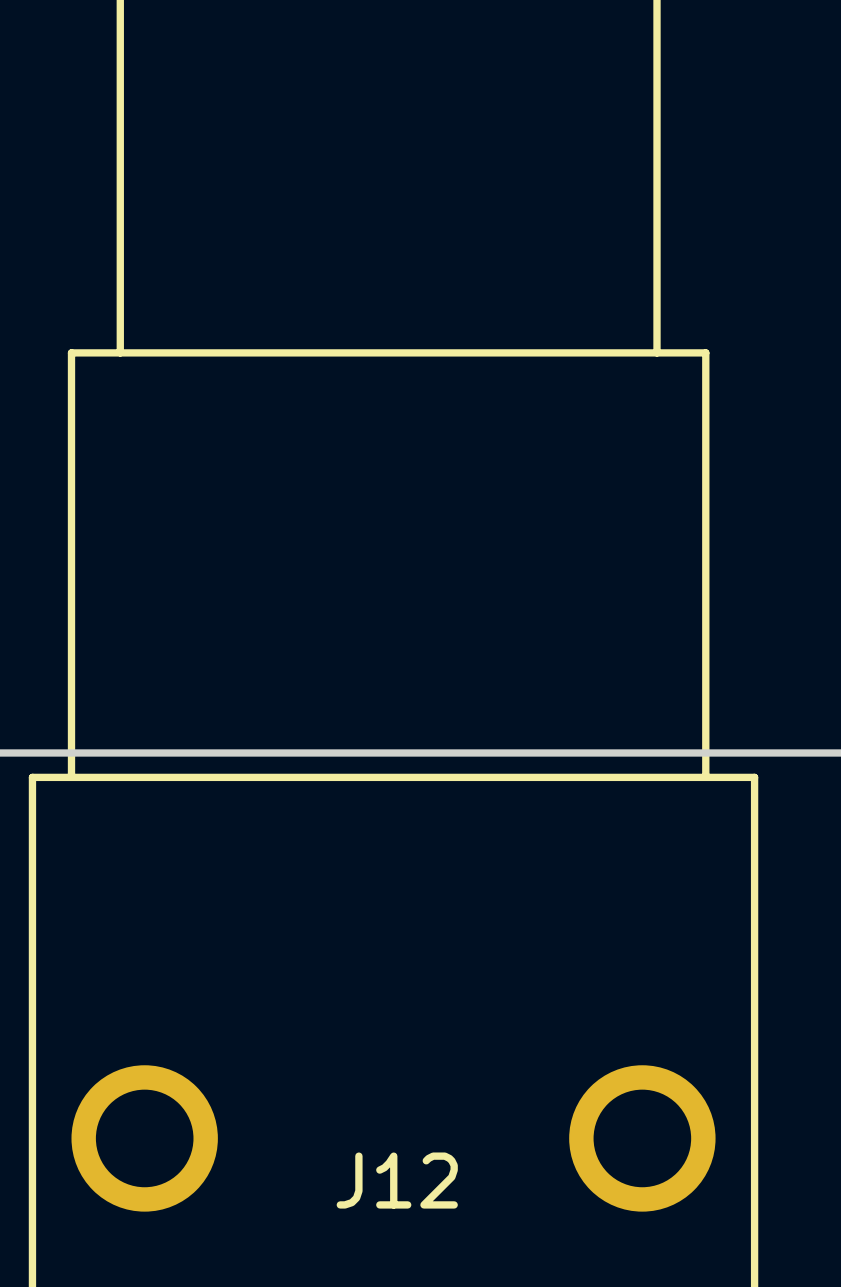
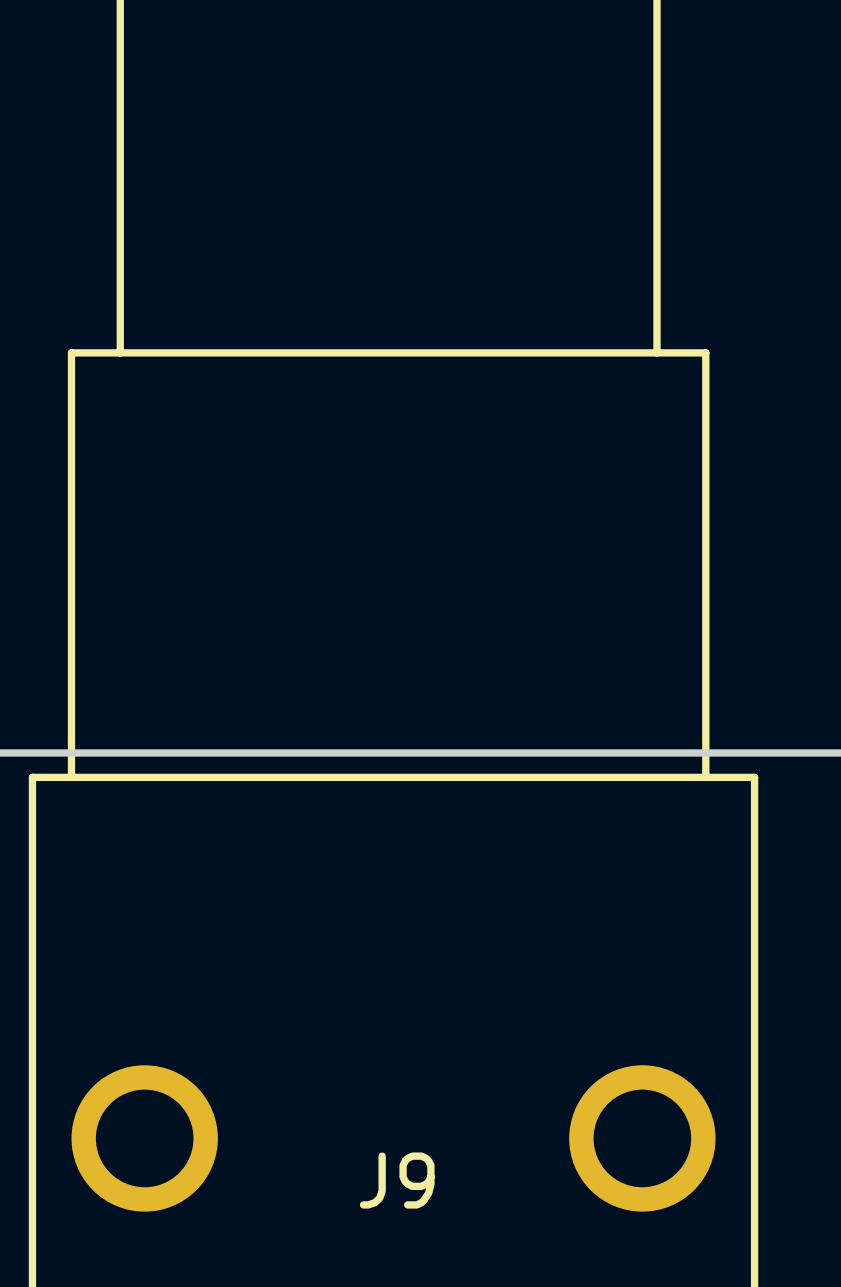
J12 name: J12 (397, 1180) -> J9 (397, 1180)

